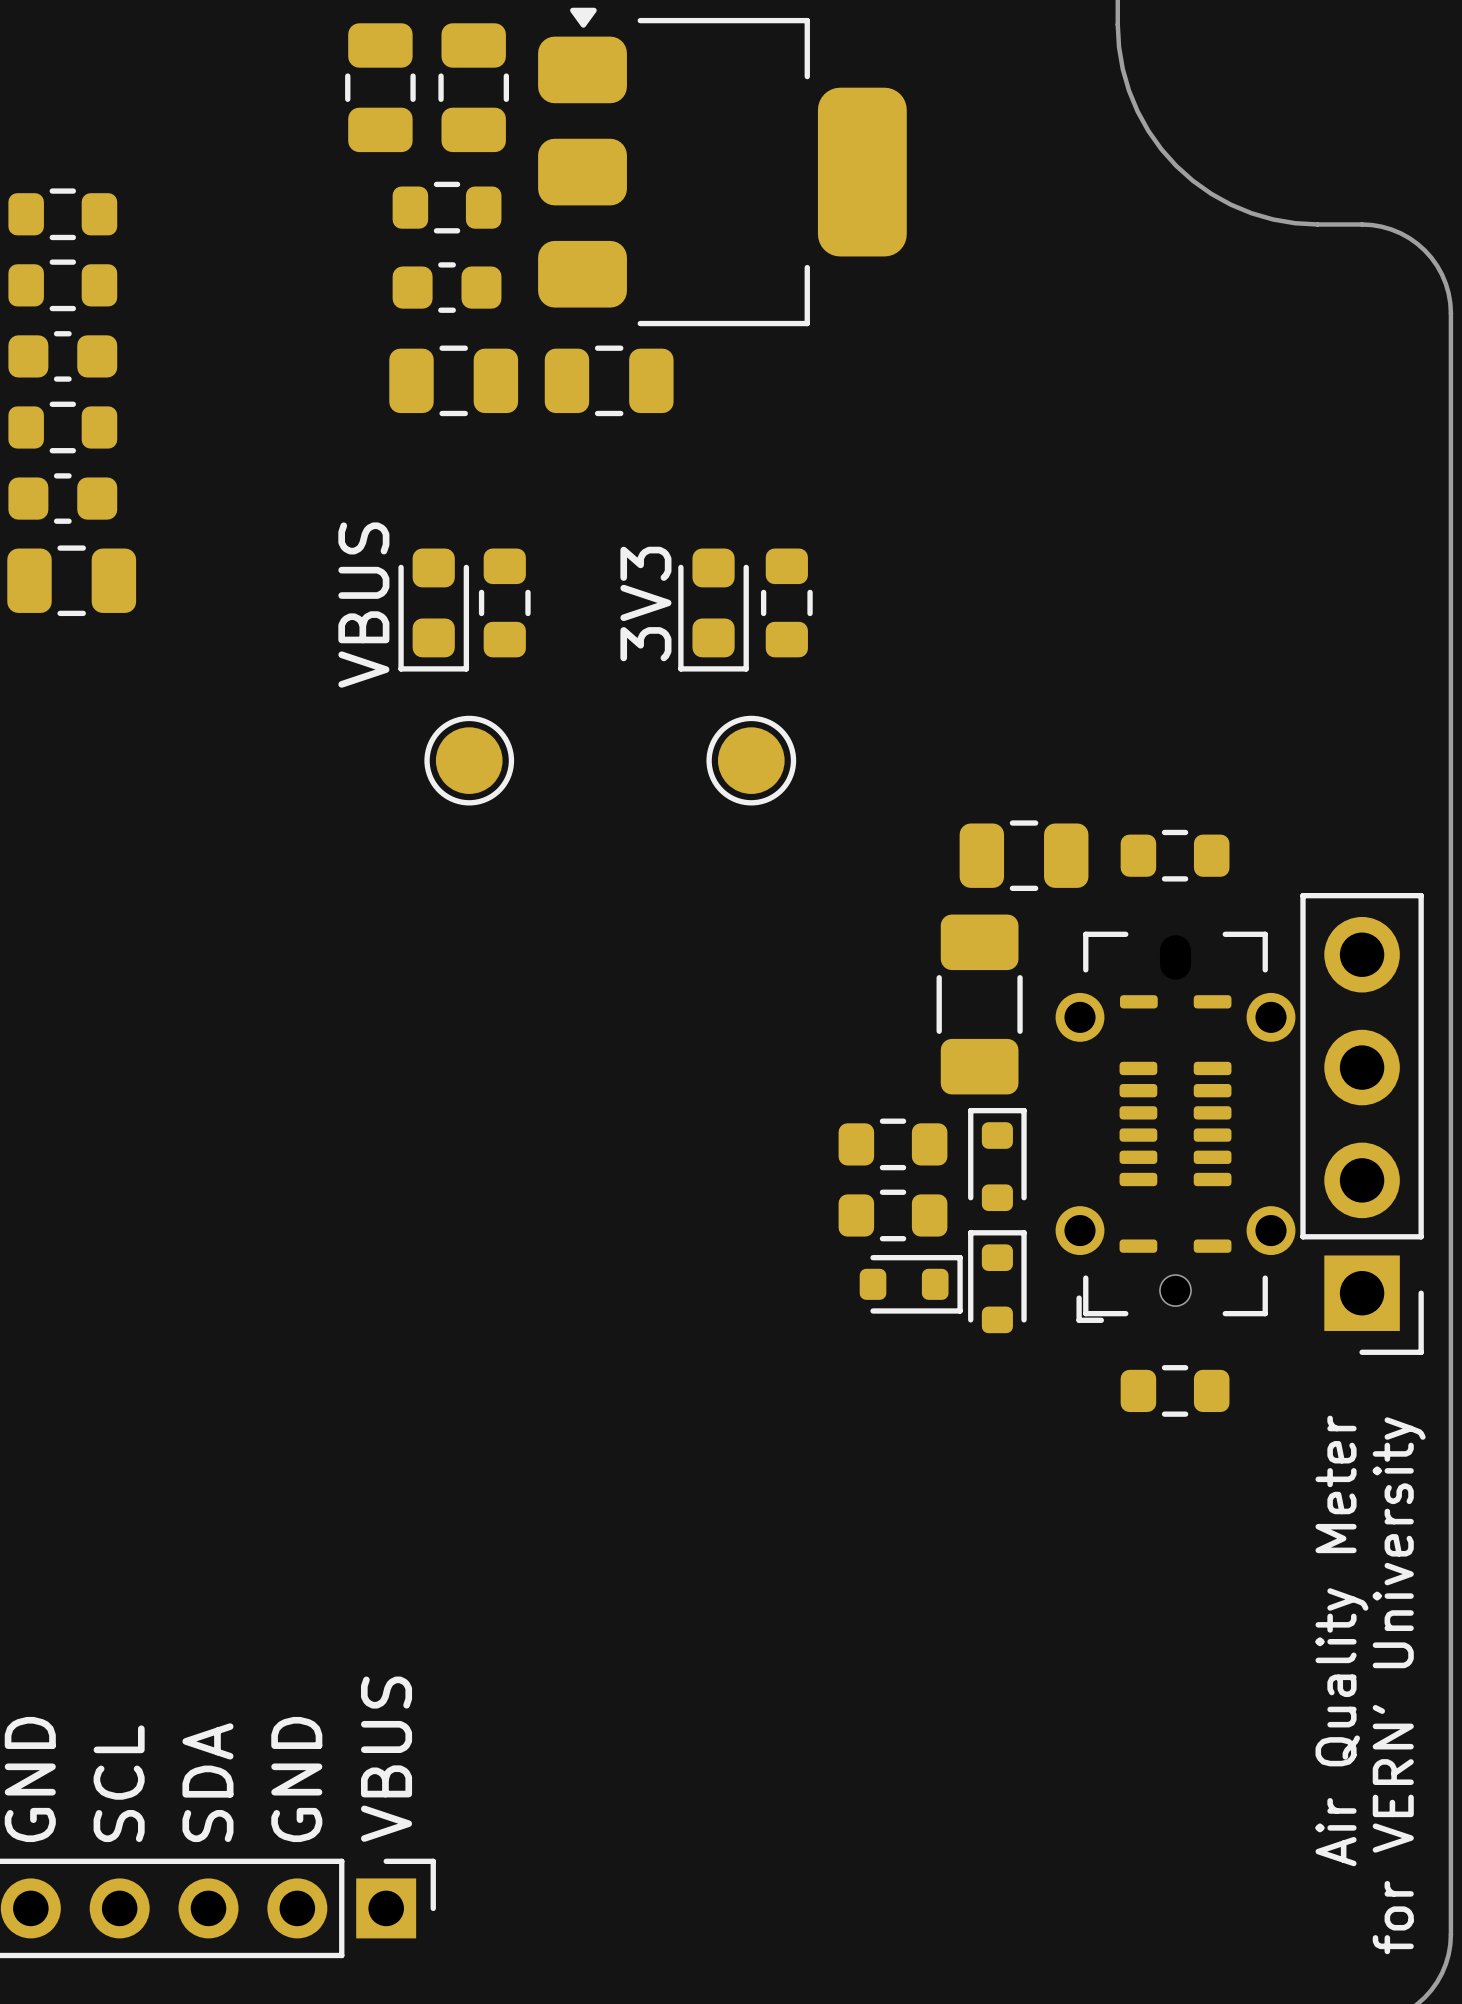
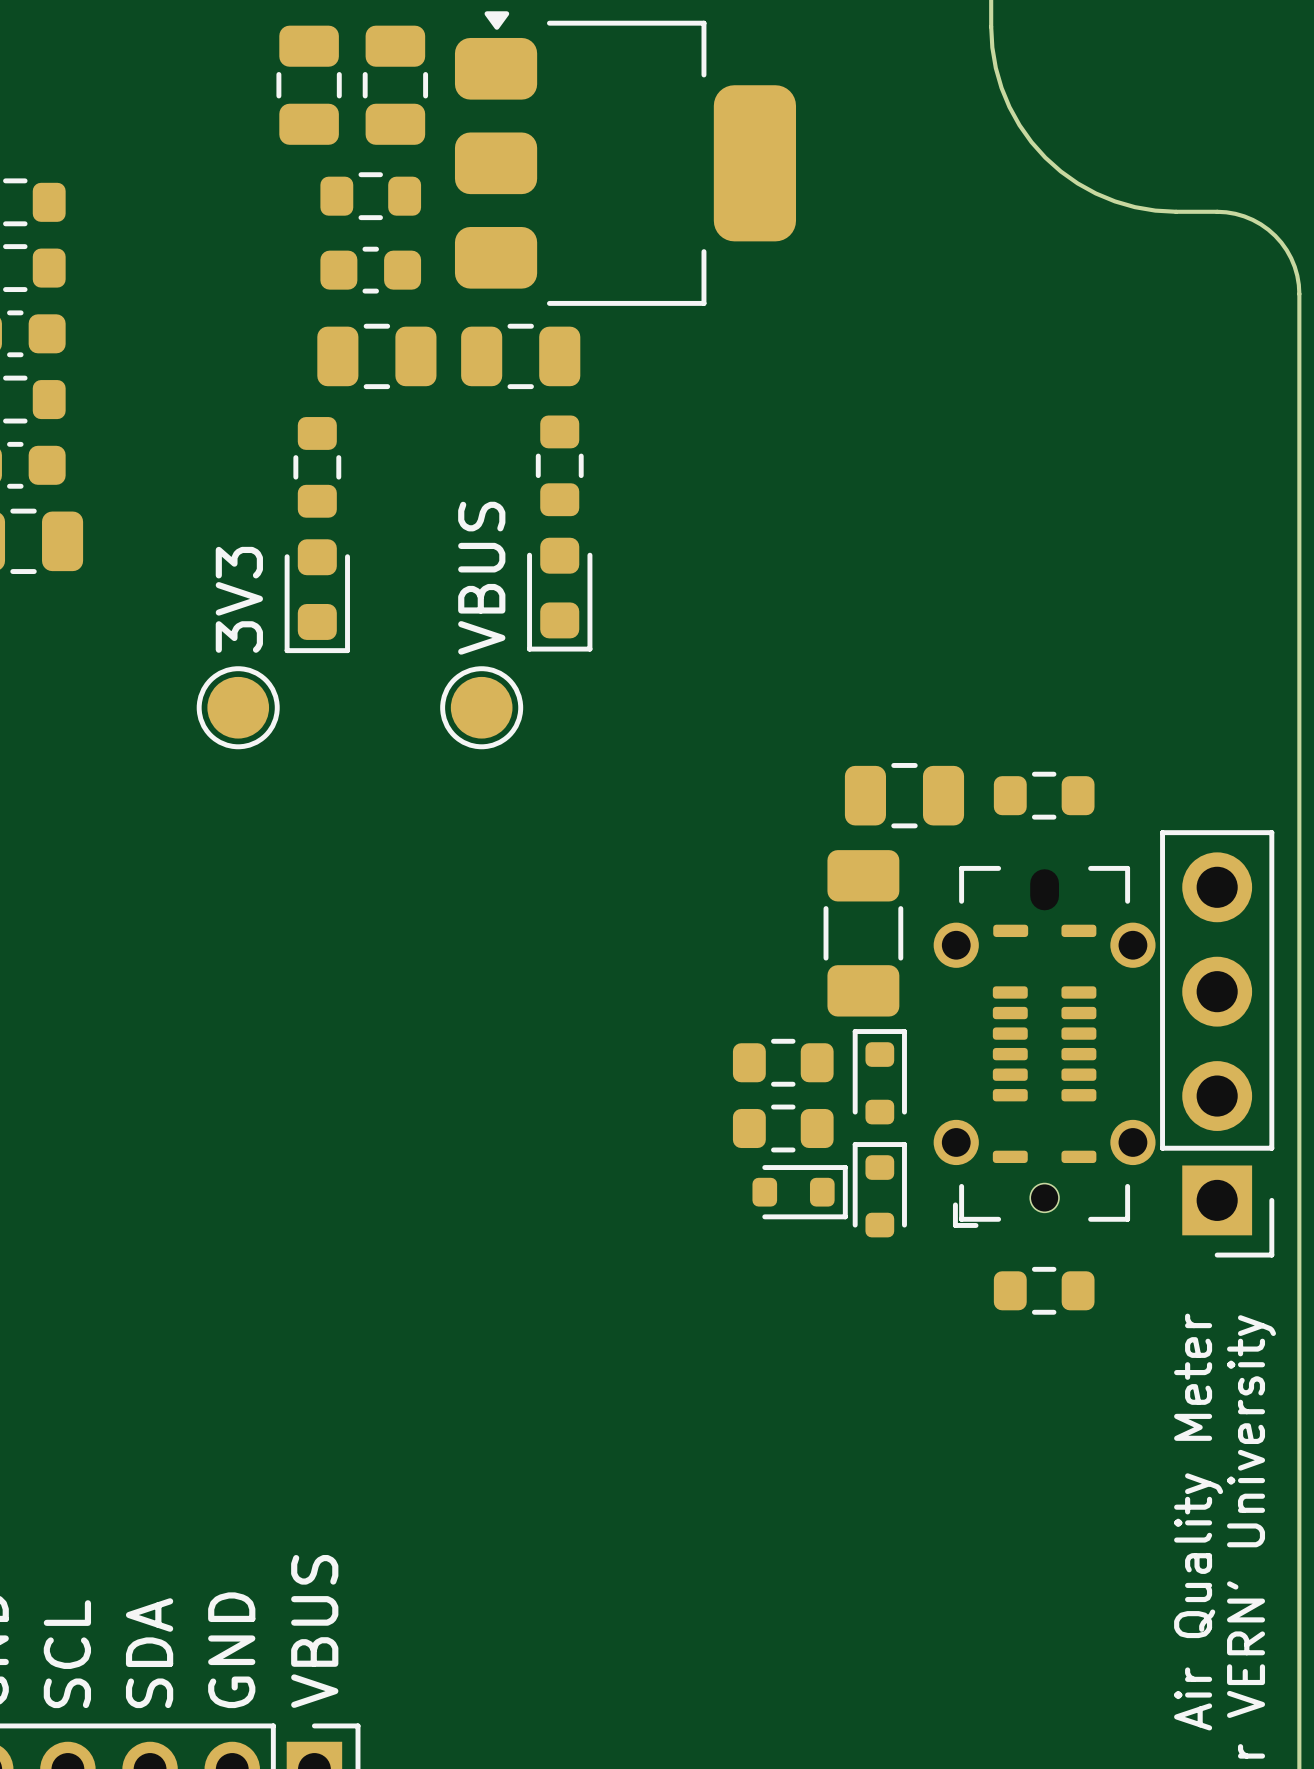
part: none -> (559, 465)
part: none -> (317, 467)
part: (504, 602) -> none
part: (786, 602) -> none
text position: 3V3 (645, 604) -> 3V3 (239, 599)
text position: VBUS (363, 605) -> VBUS (481, 578)
part position: (433, 610) -> (317, 596)
part position: (713, 610) -> (559, 594)
part: none -> (238, 707)
part: (469, 760) -> none
part: none -> (481, 707)
part: (751, 760) -> none

